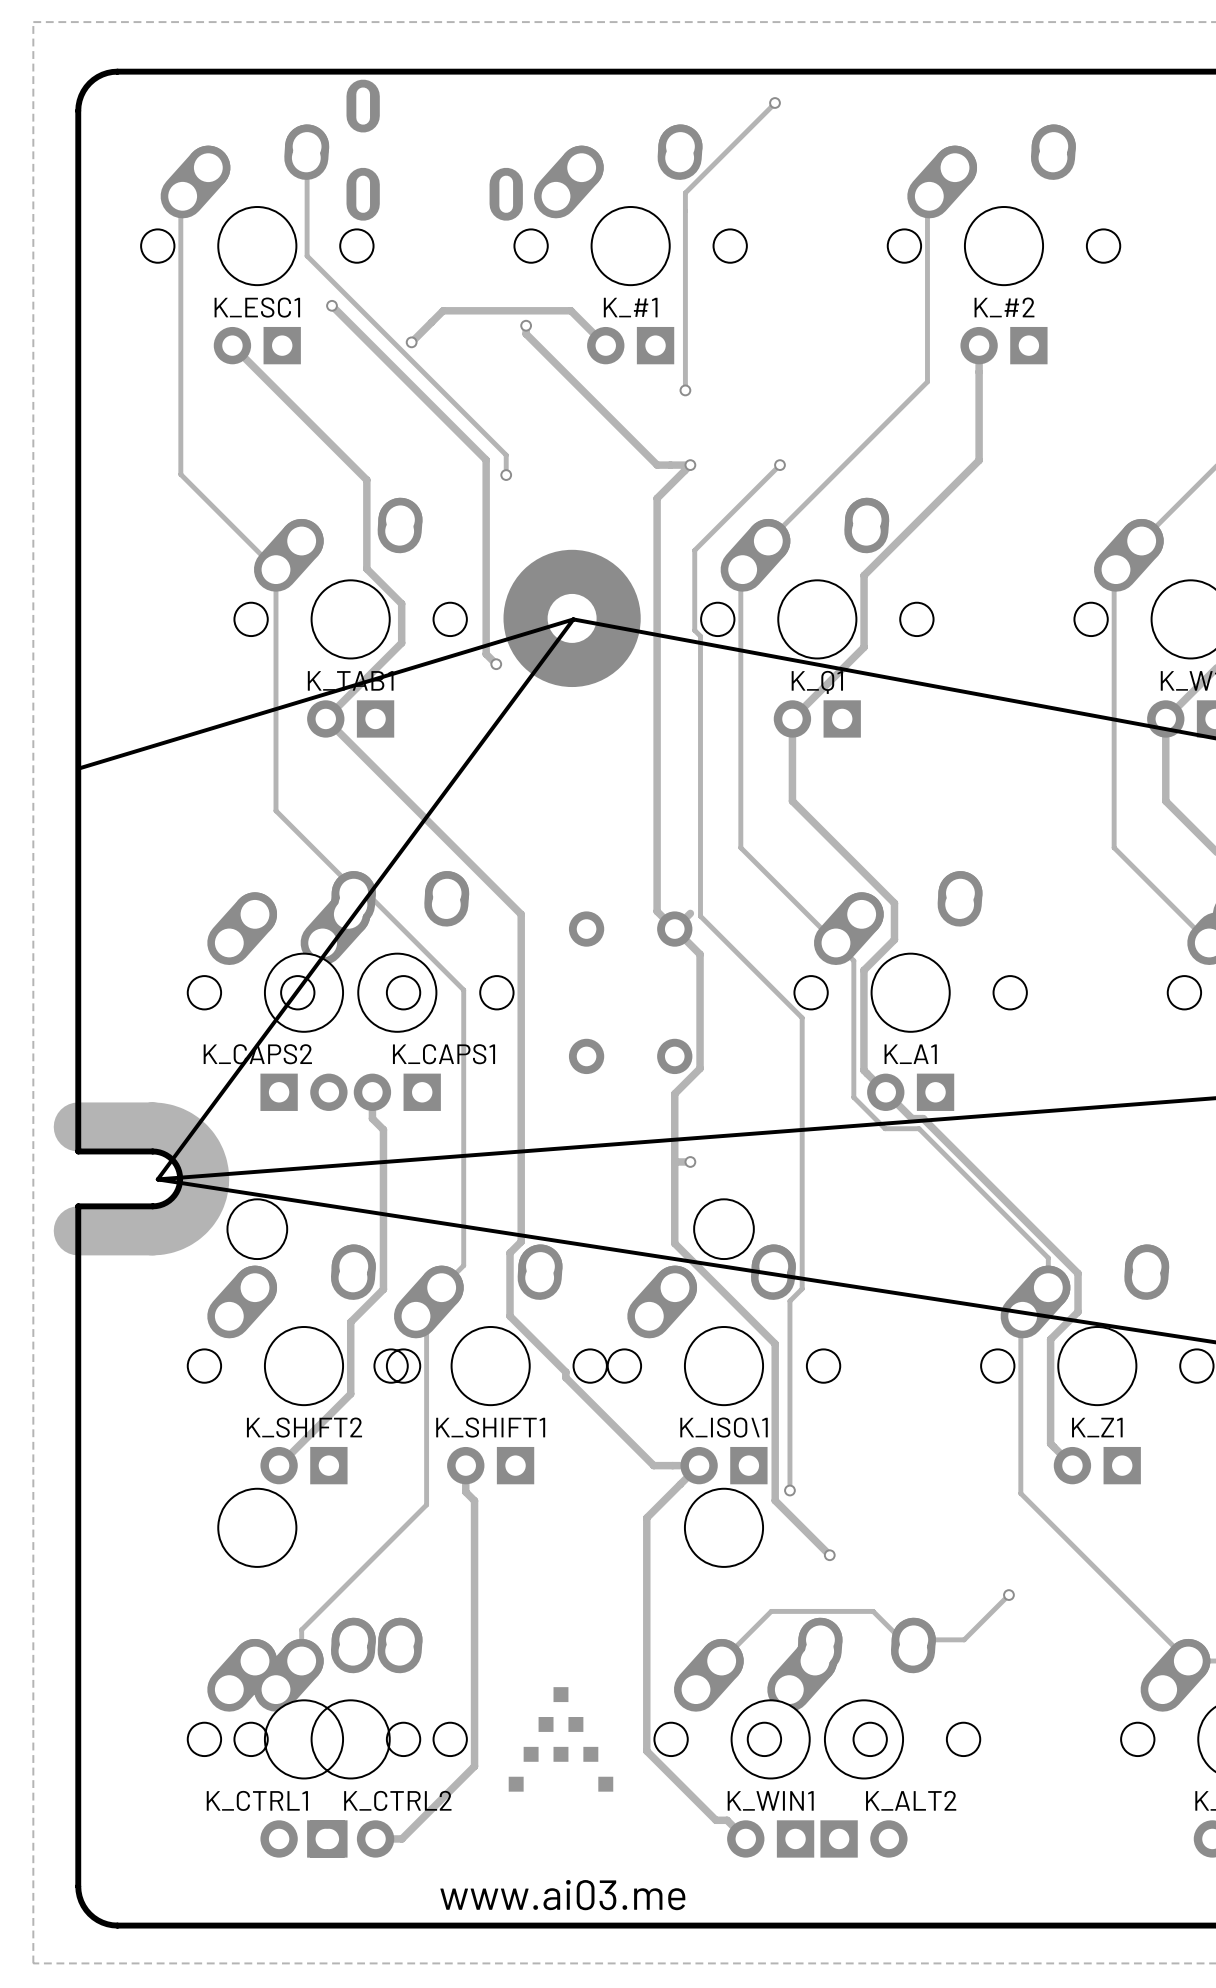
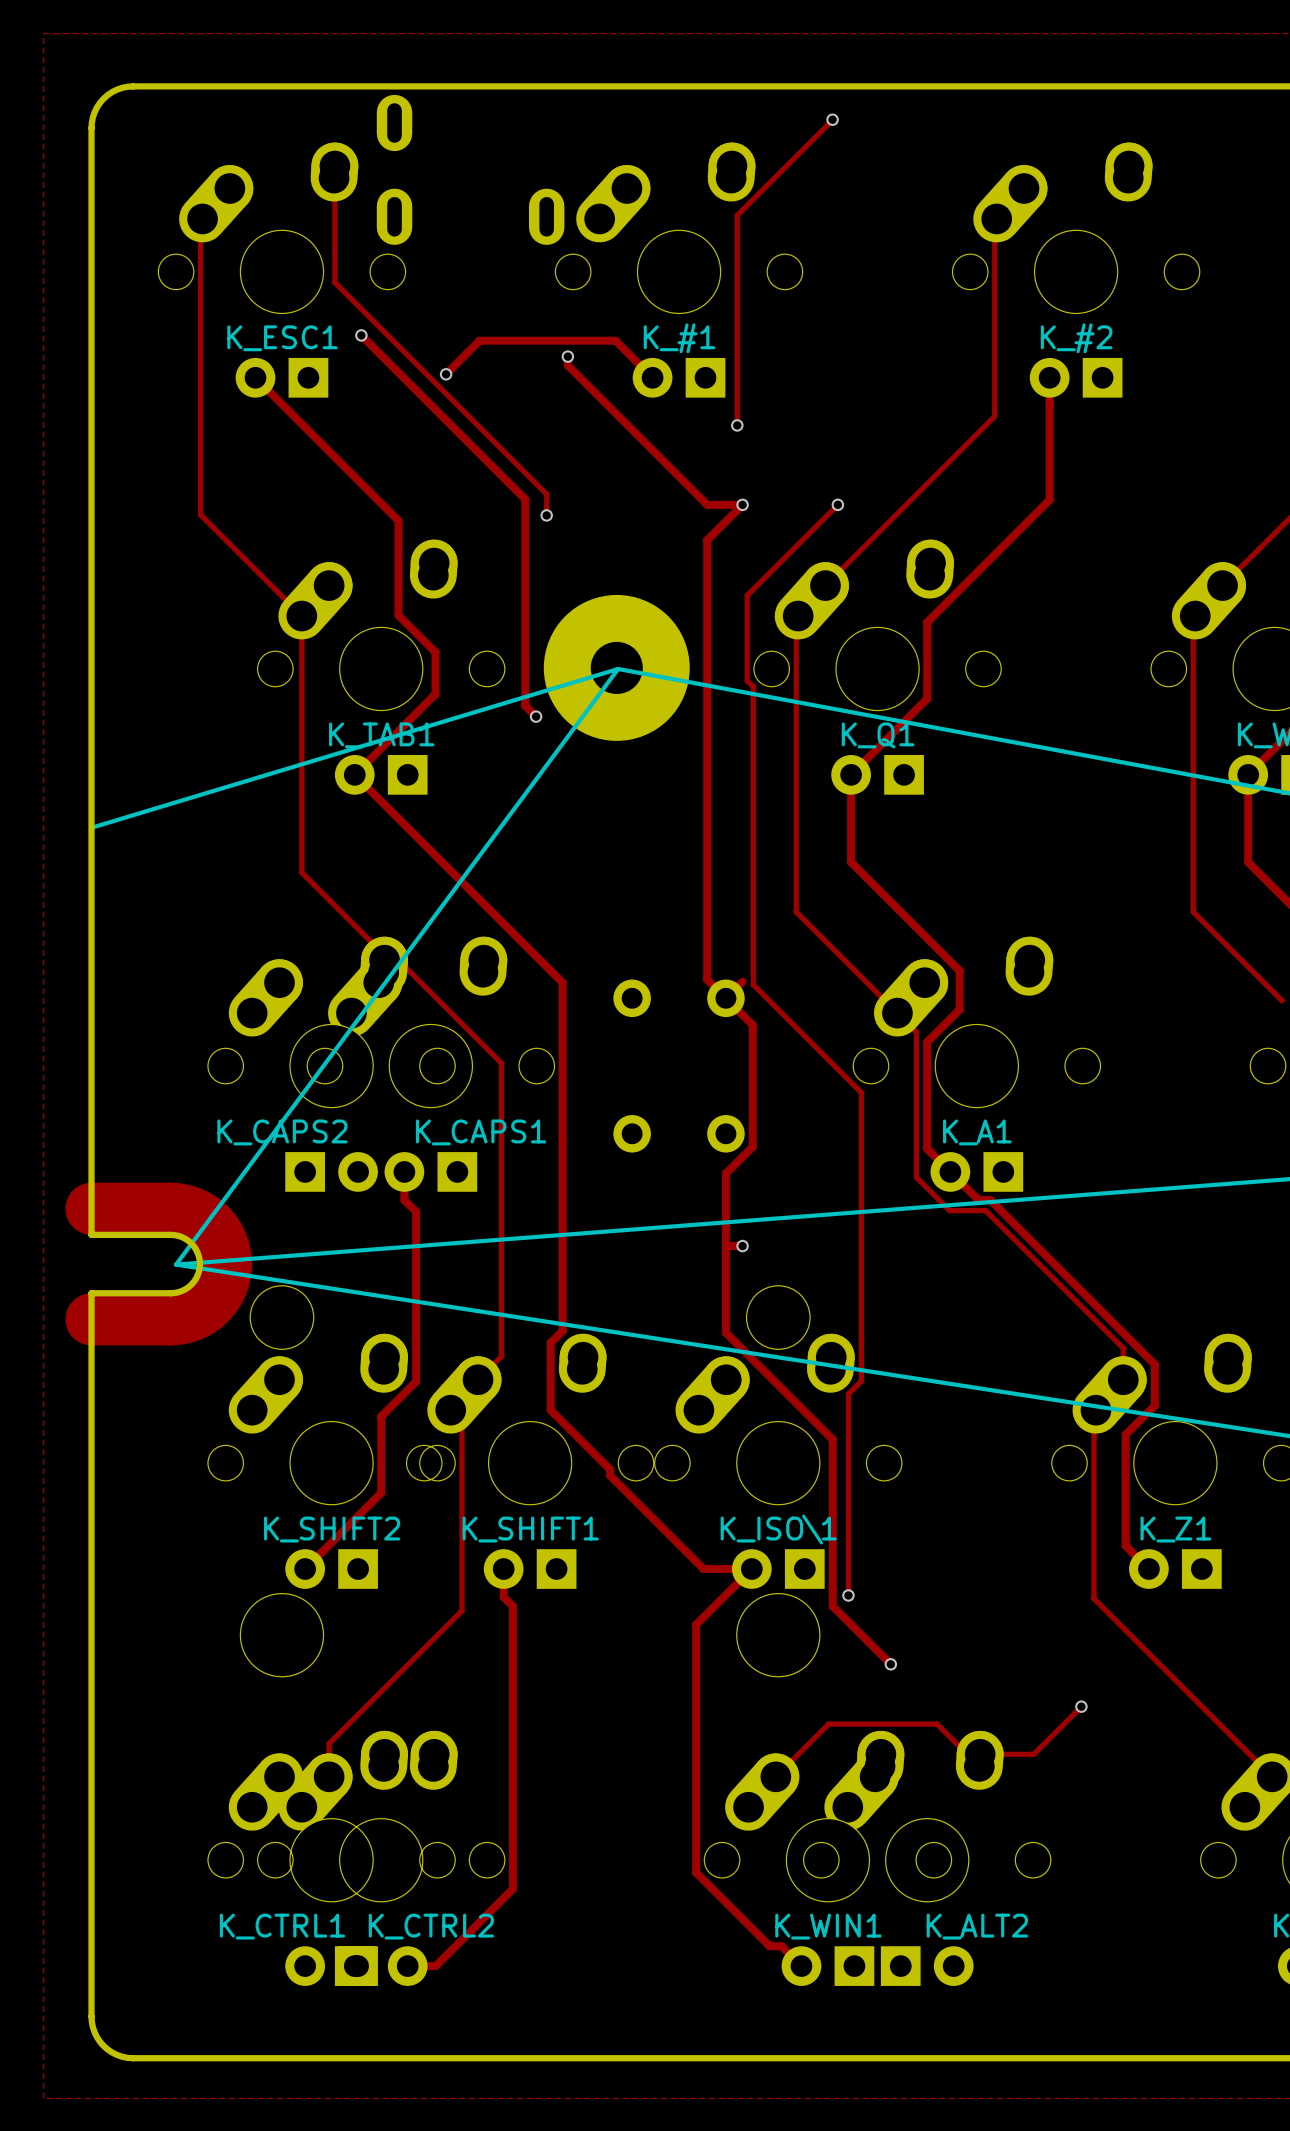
part: (560, 1739) -> none
text: www.ai03.me (562, 1895) -> none

